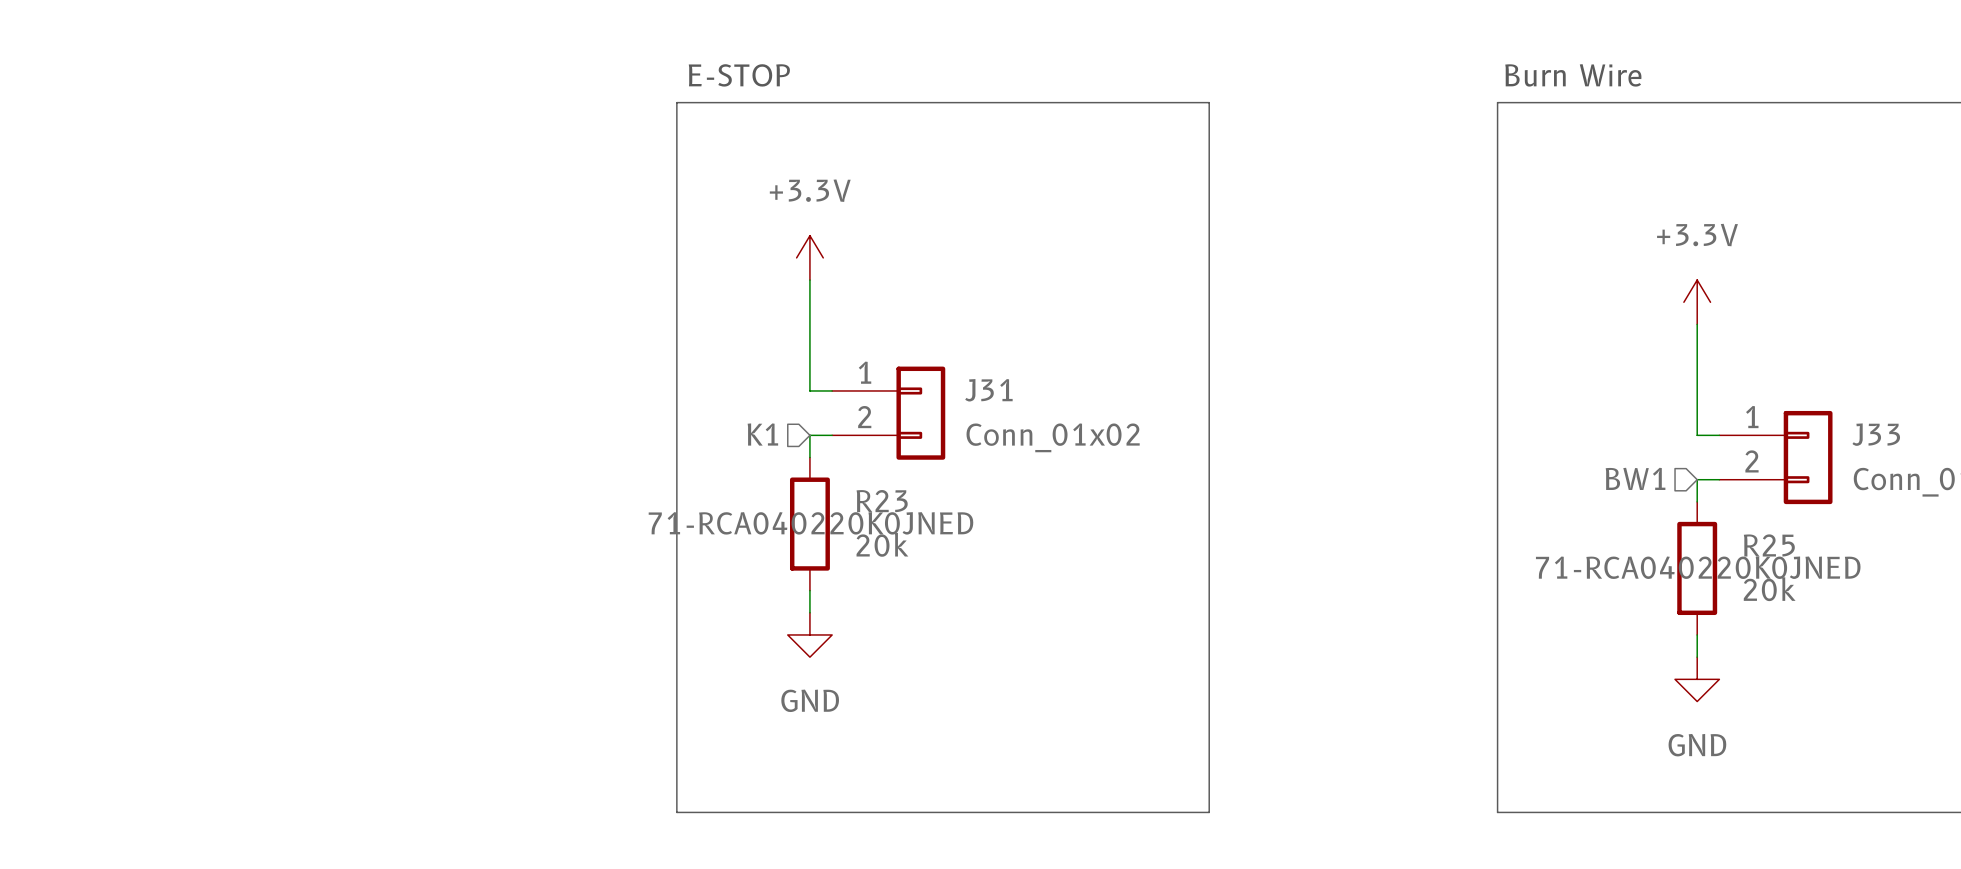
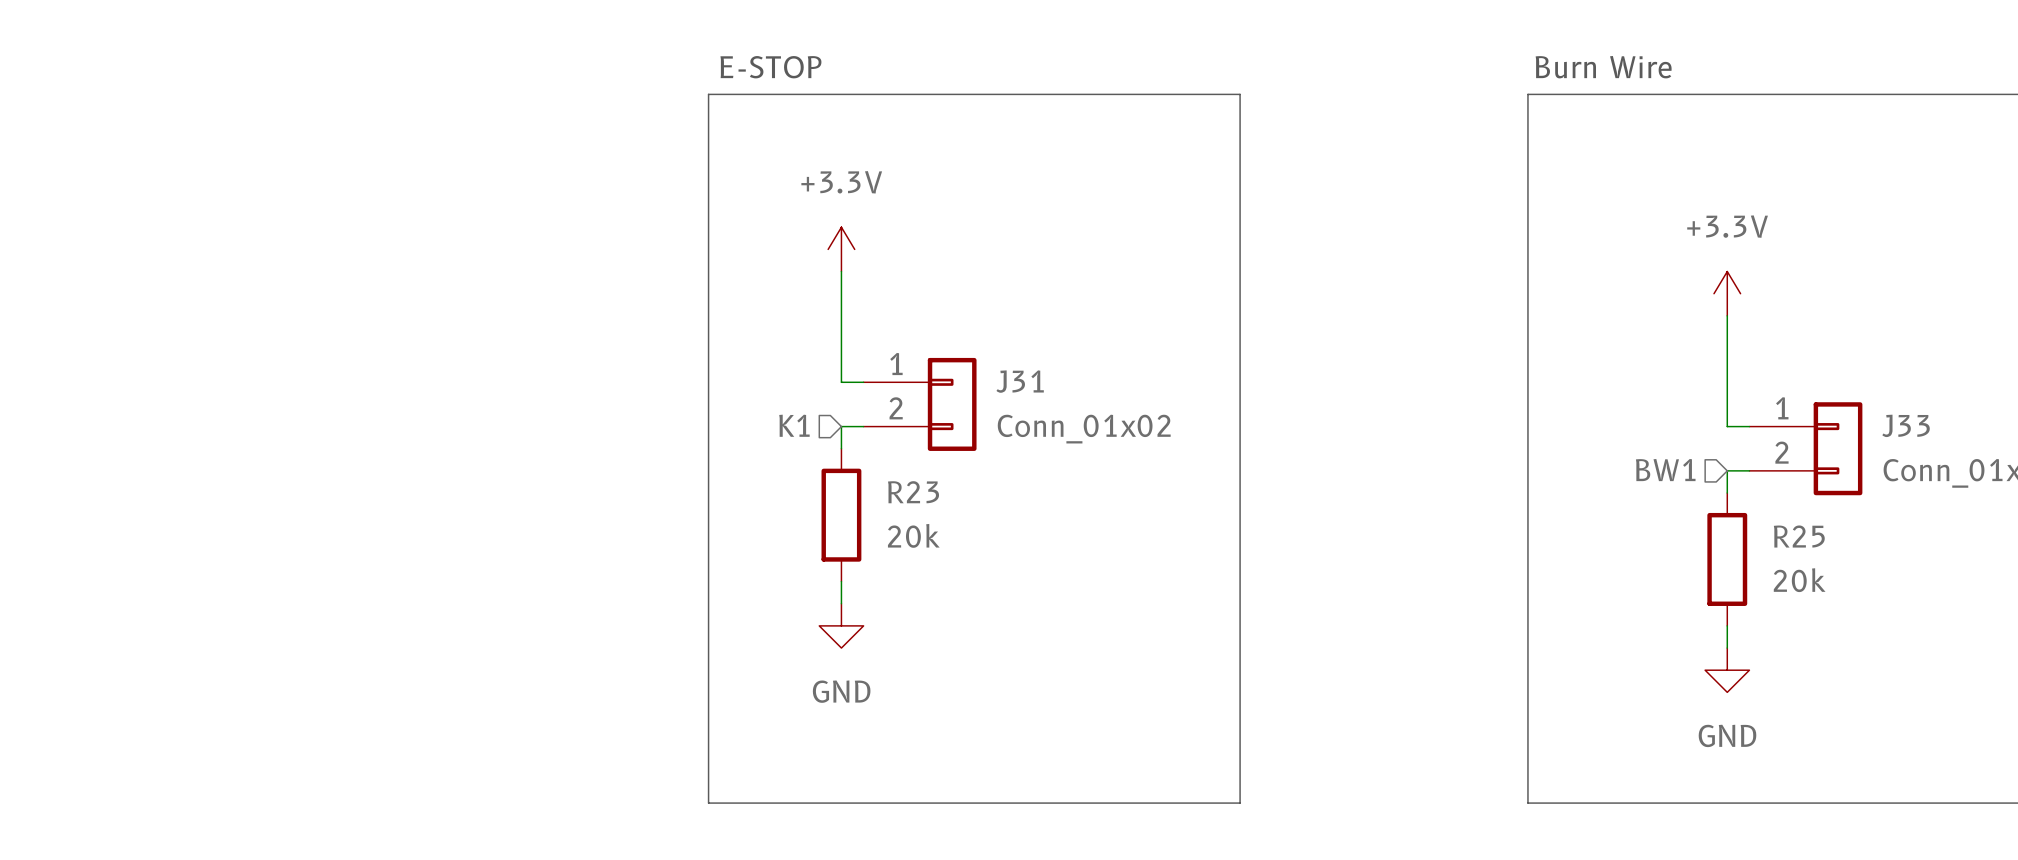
R23 text: 71-RCA040220K0JNED (810, 523) -> none
R25 text: 71-RCA040220K0JNED (1698, 567) -> none

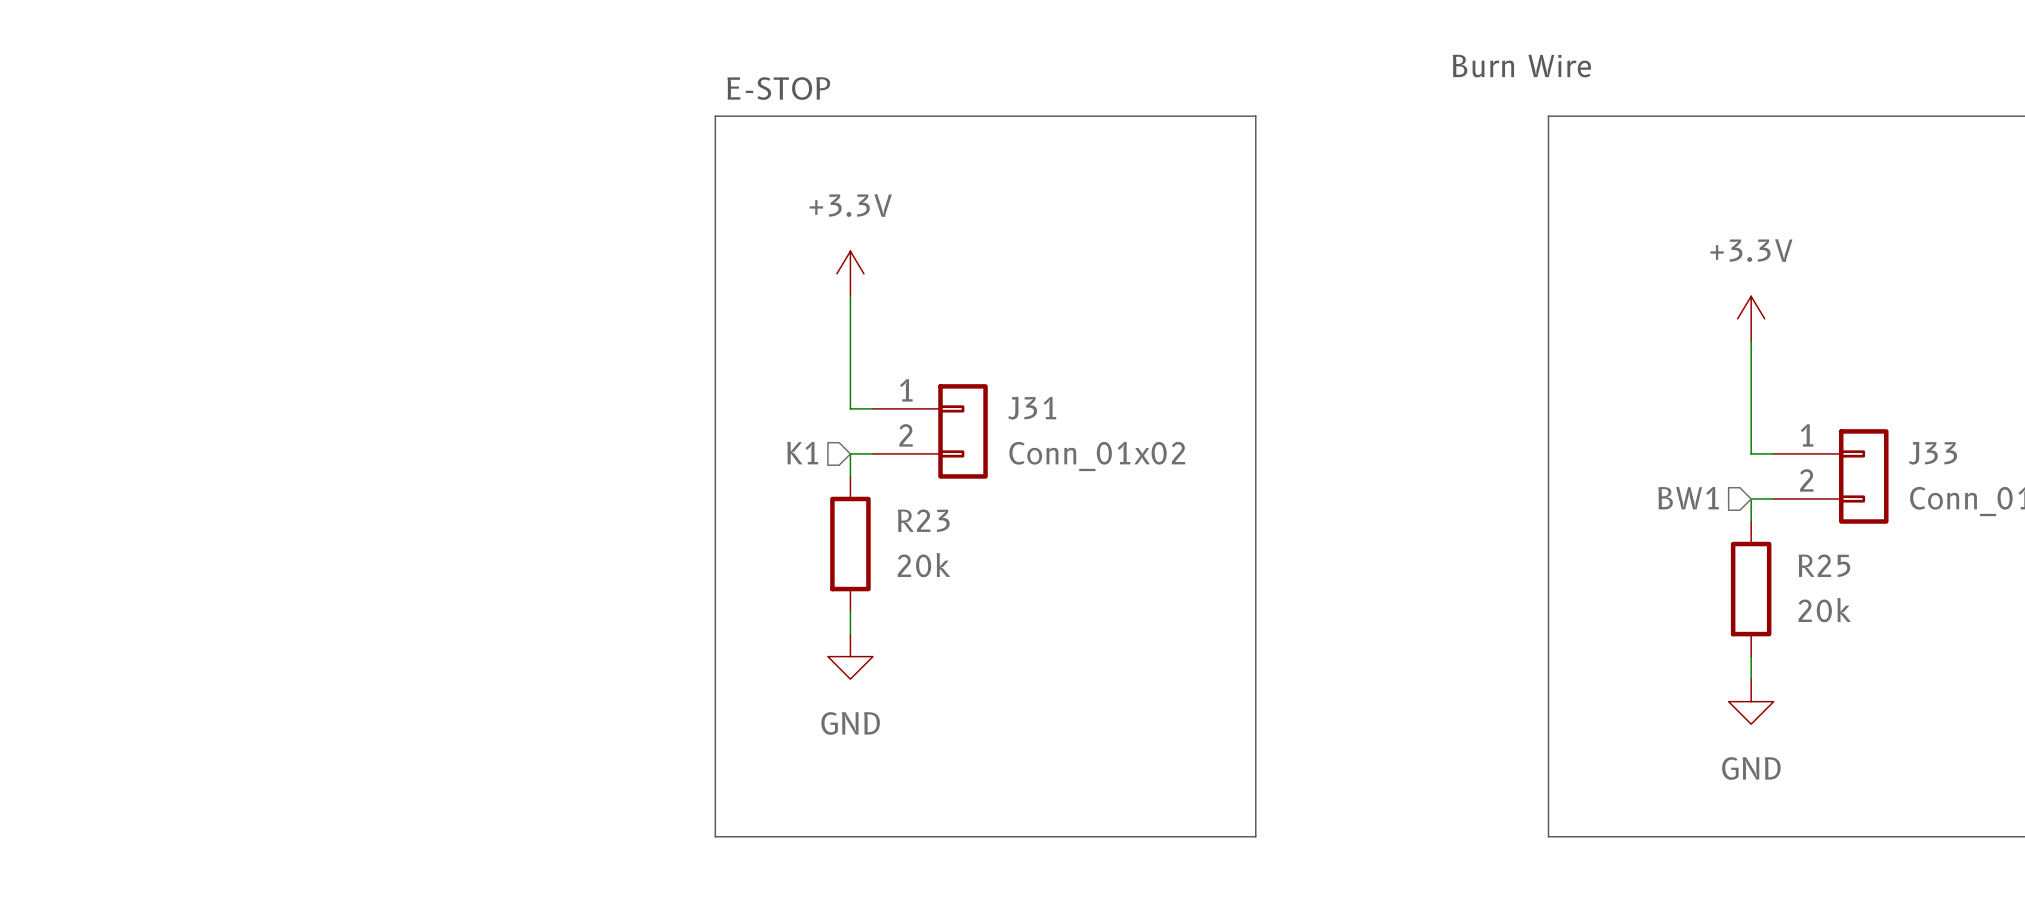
text position: Burn Wire (1603, 67) -> Burn Wire (1521, 65)

